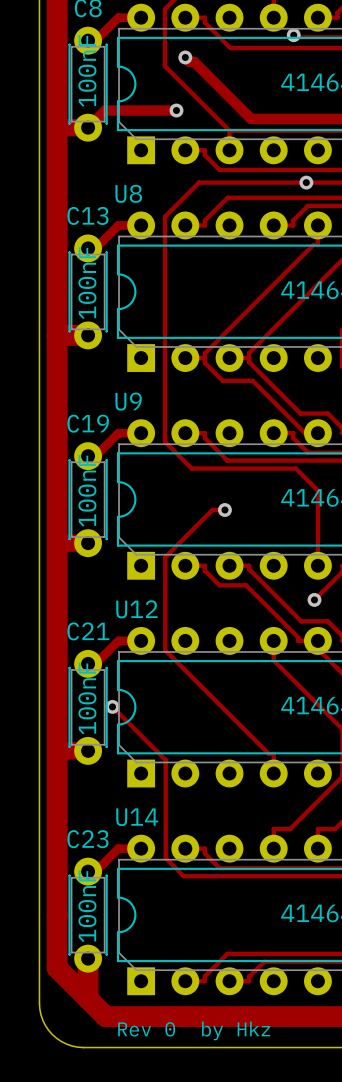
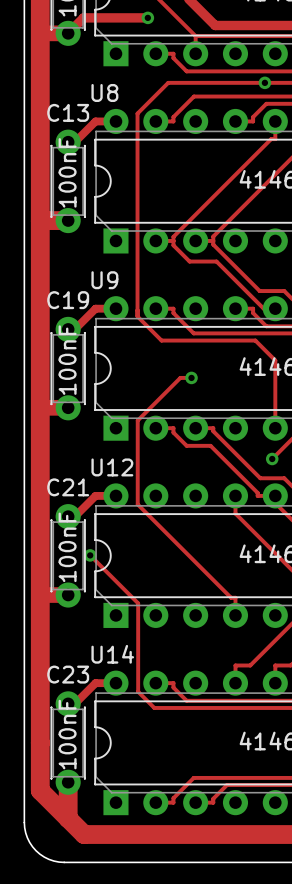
text: Rev 0 by Hkz (194, 1030) -> none

